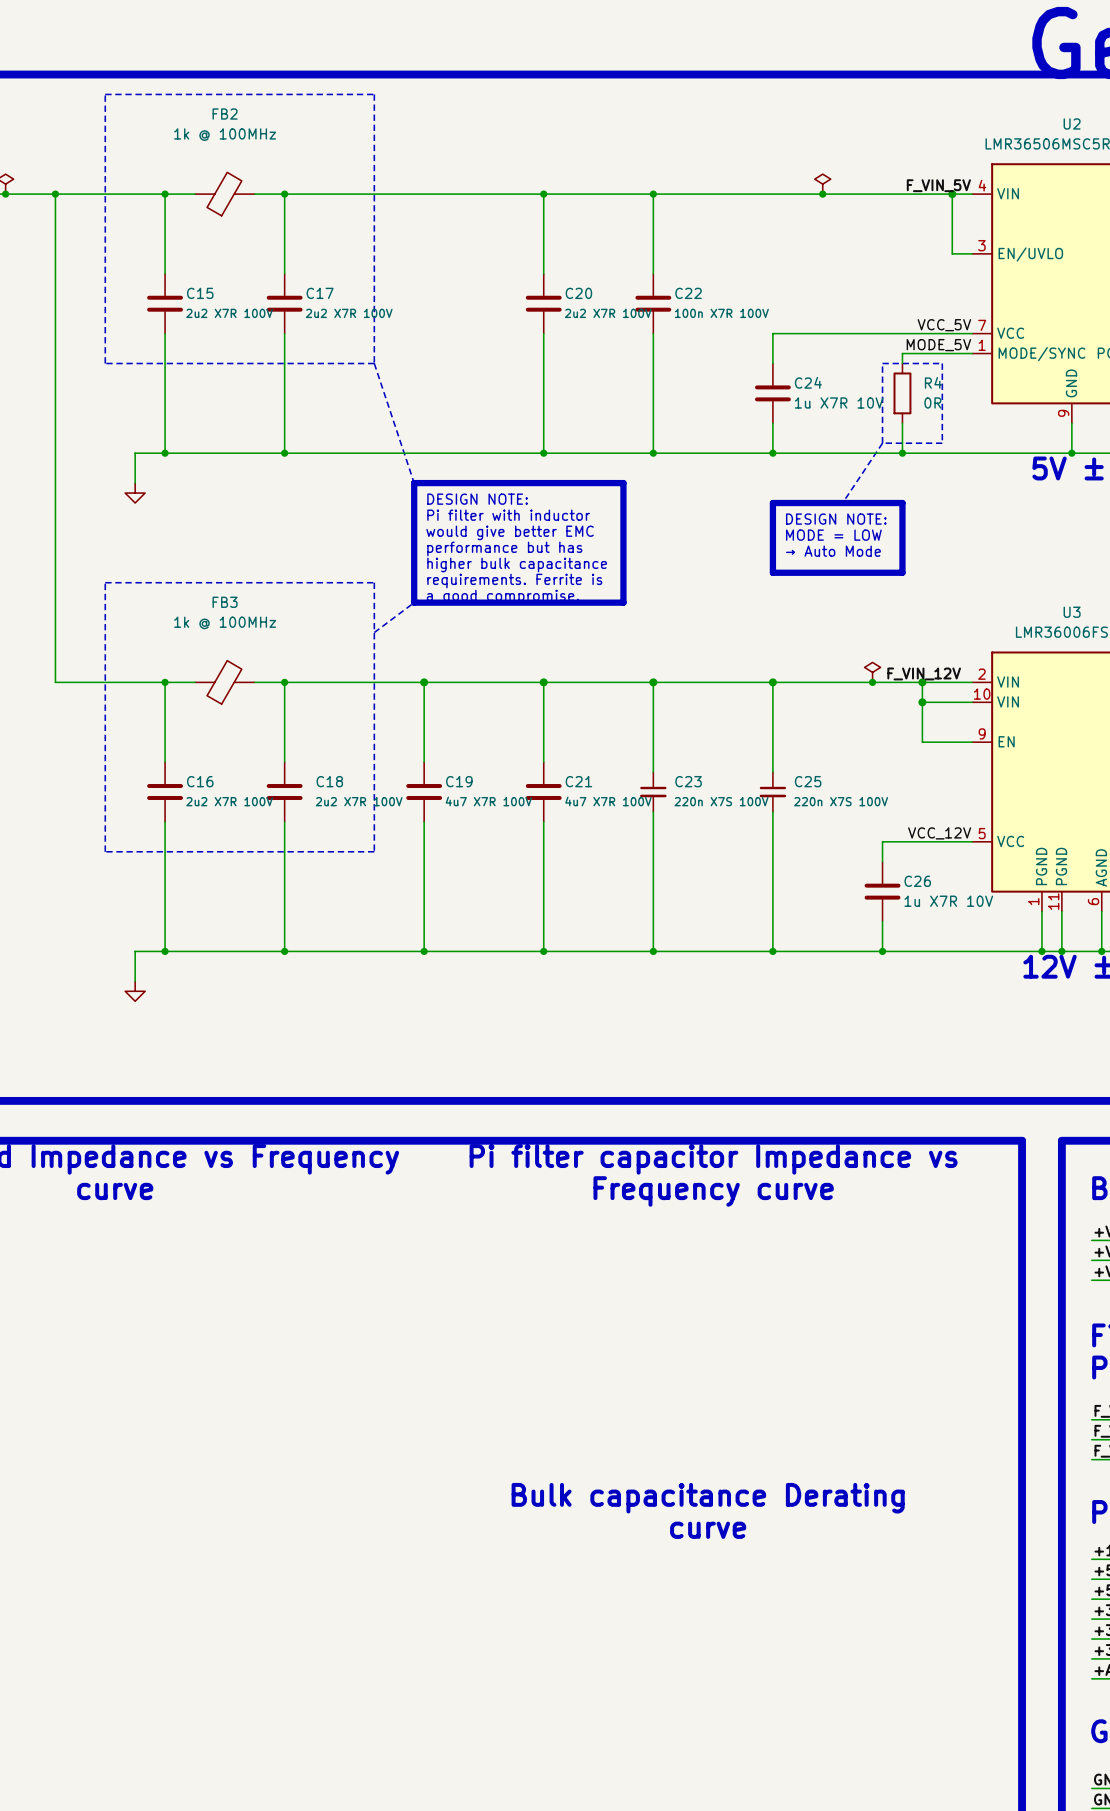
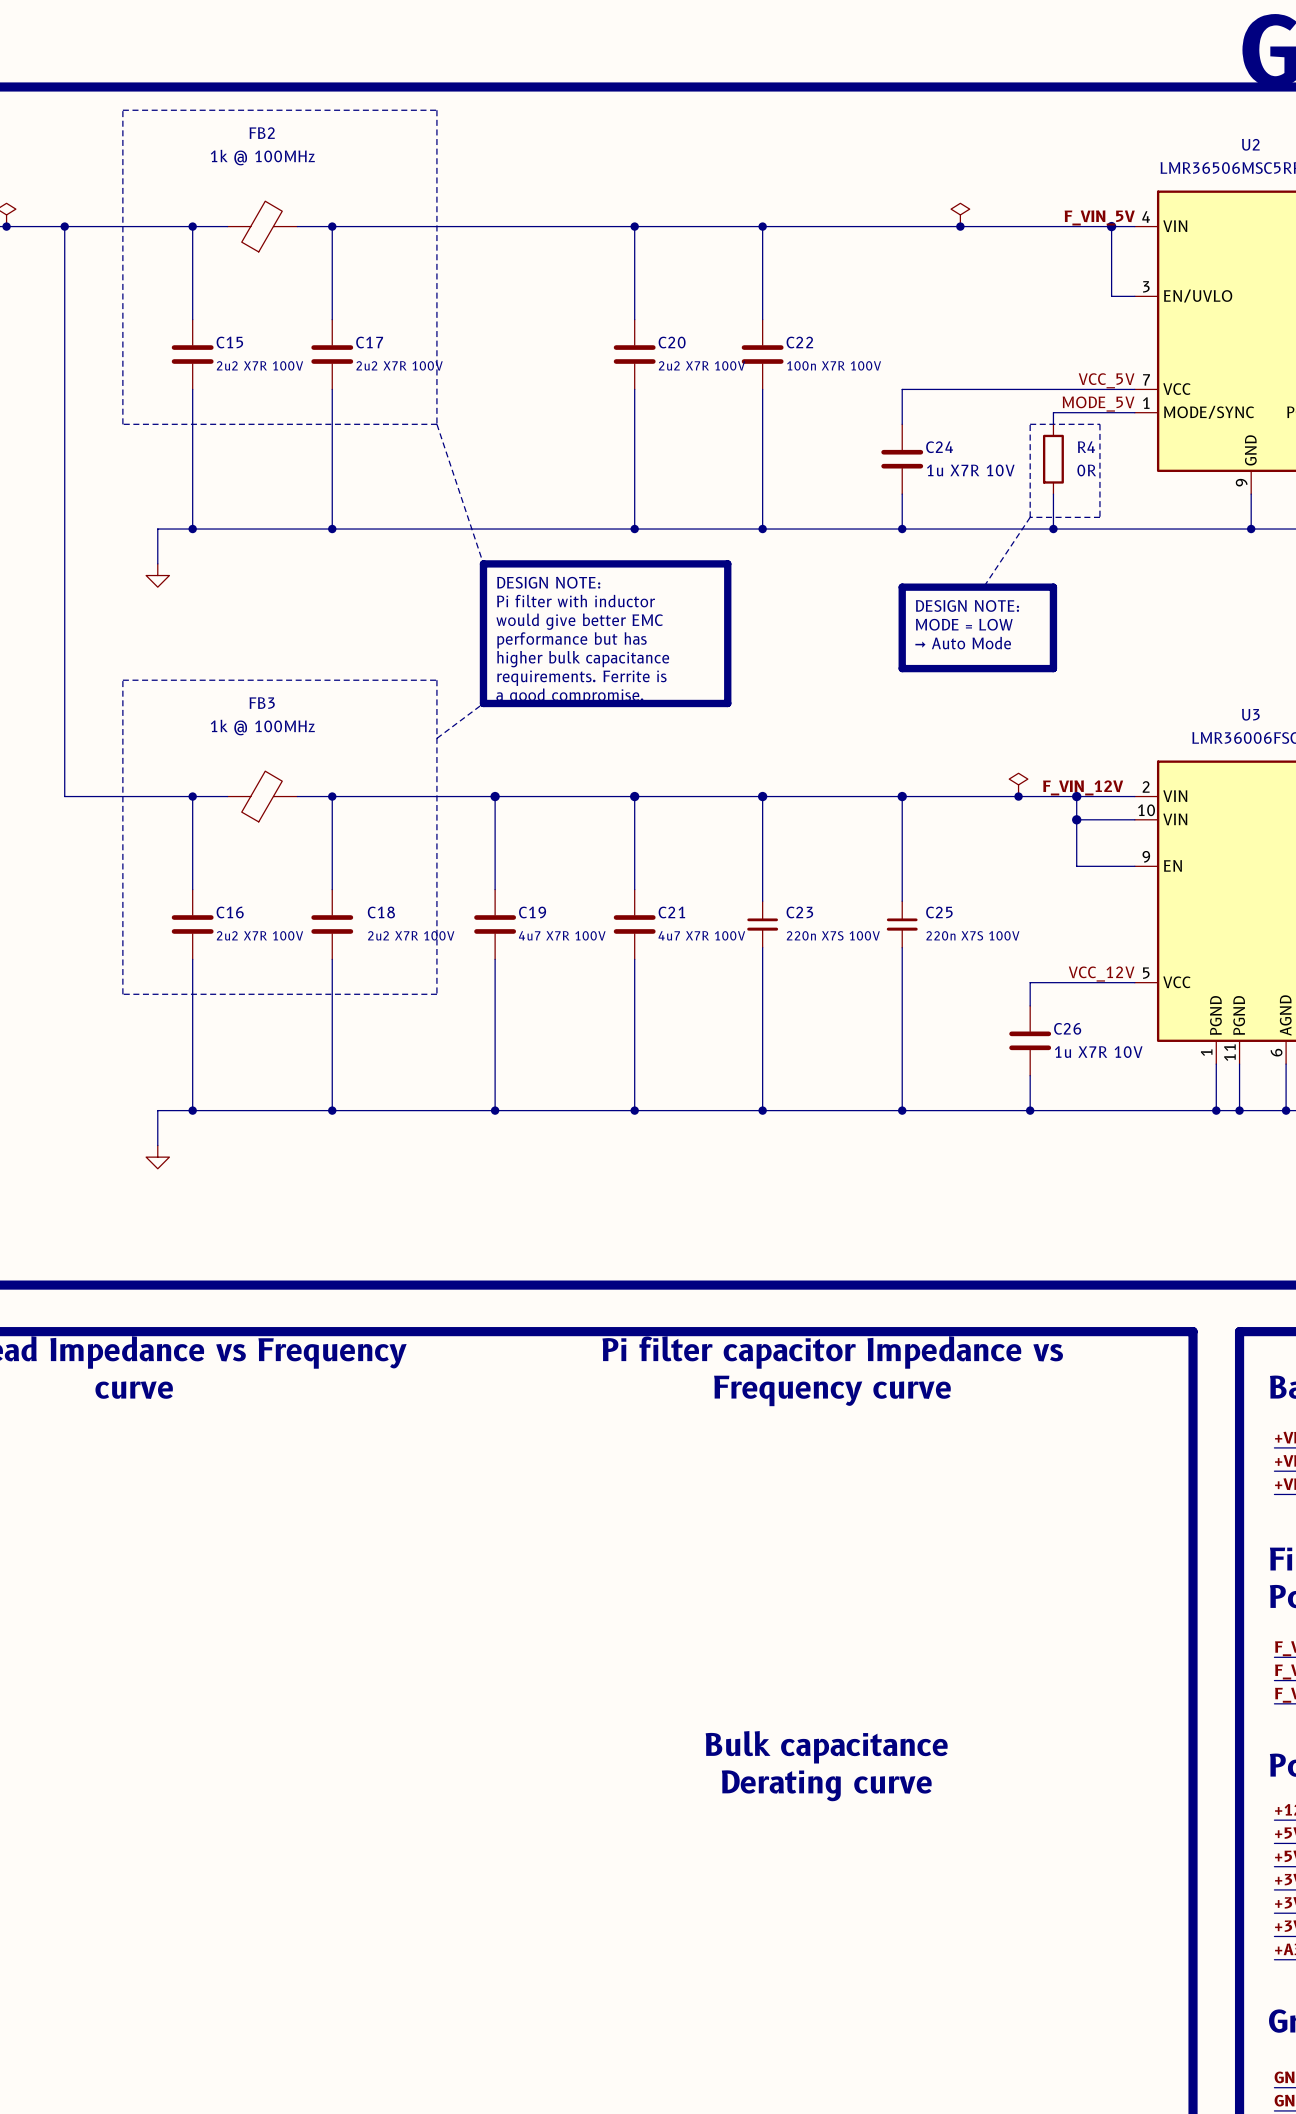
text: Bulk capacitance Derating (708, 1498) -> Bulk capacitance (826, 1747)
text: curve (708, 1530) -> Derating curve (826, 1785)

